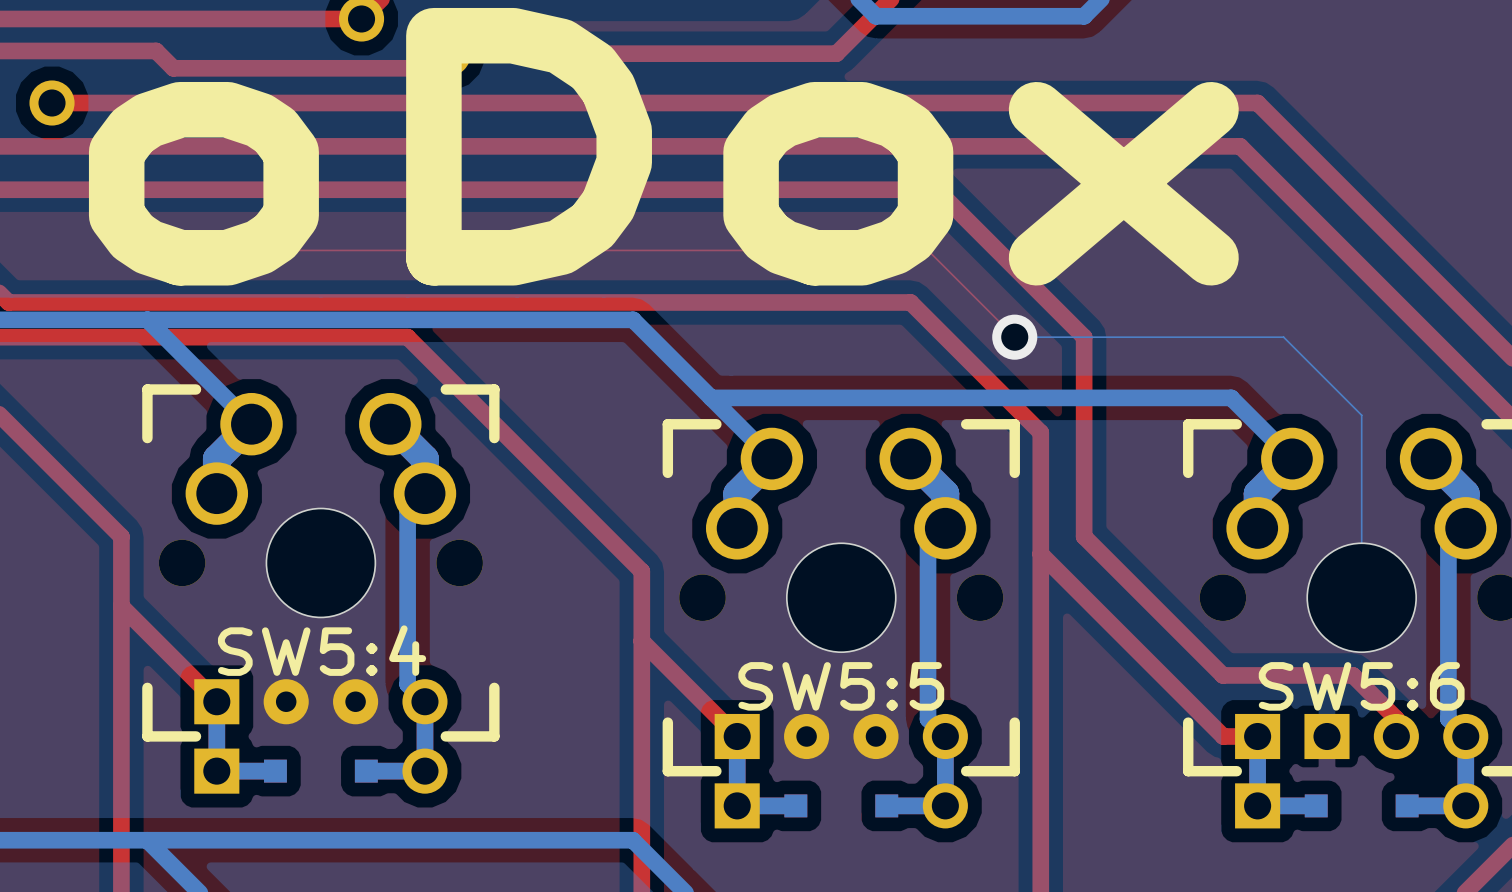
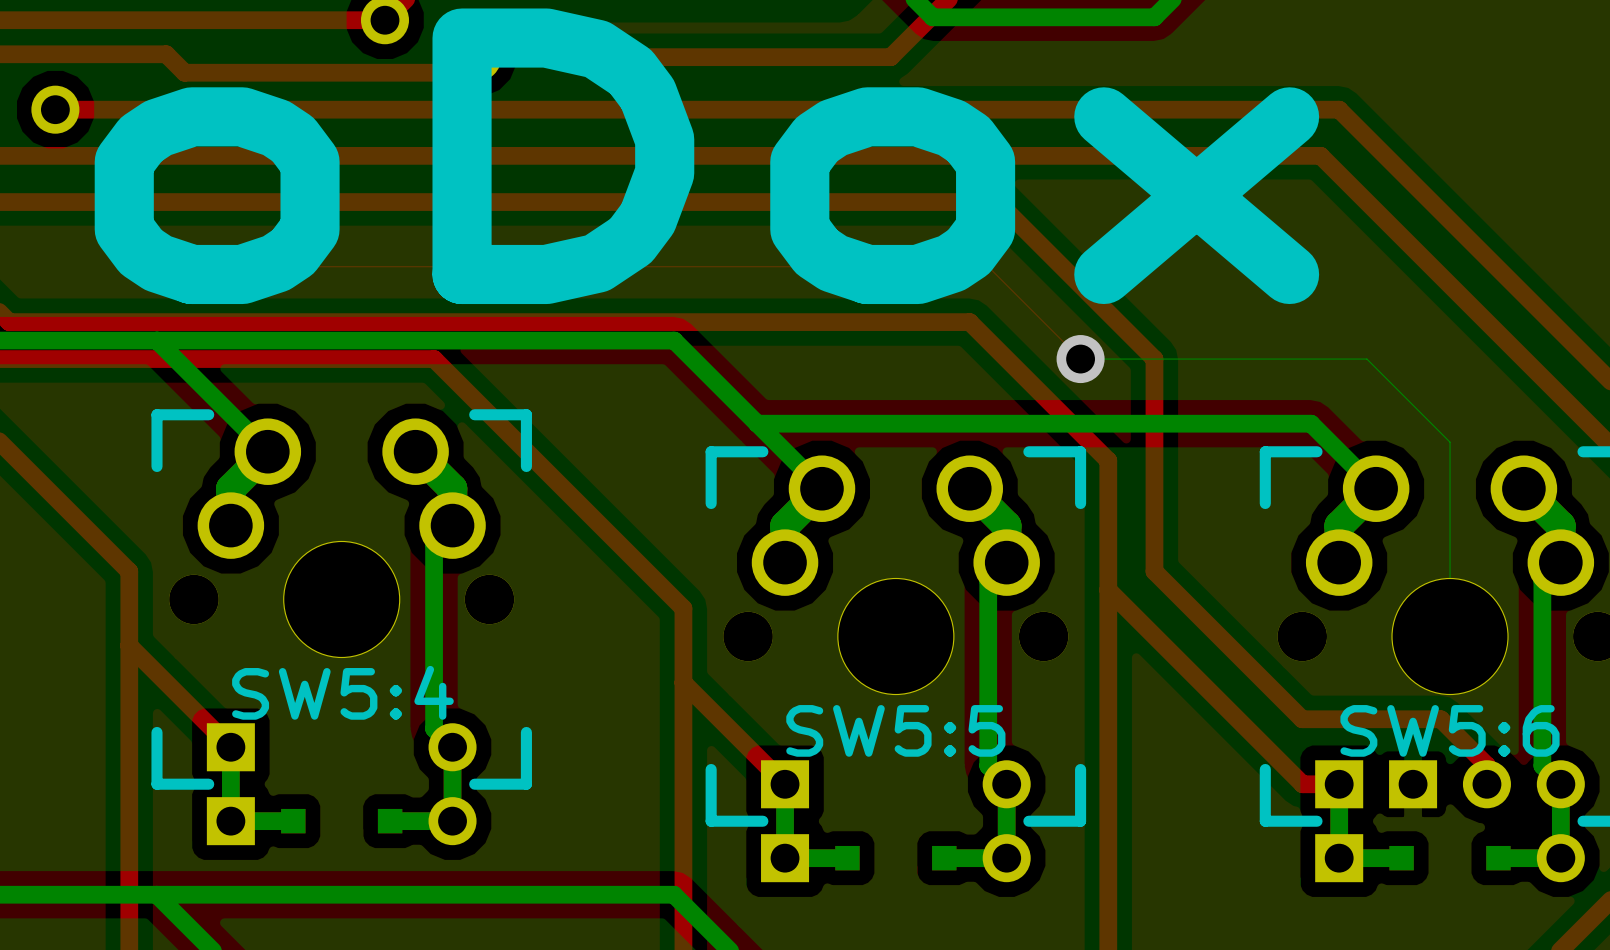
part footprint: [142, 384, 500, 794] -> [151, 409, 532, 846]
part footprint: [662, 419, 1020, 829] -> [705, 446, 1087, 883]

